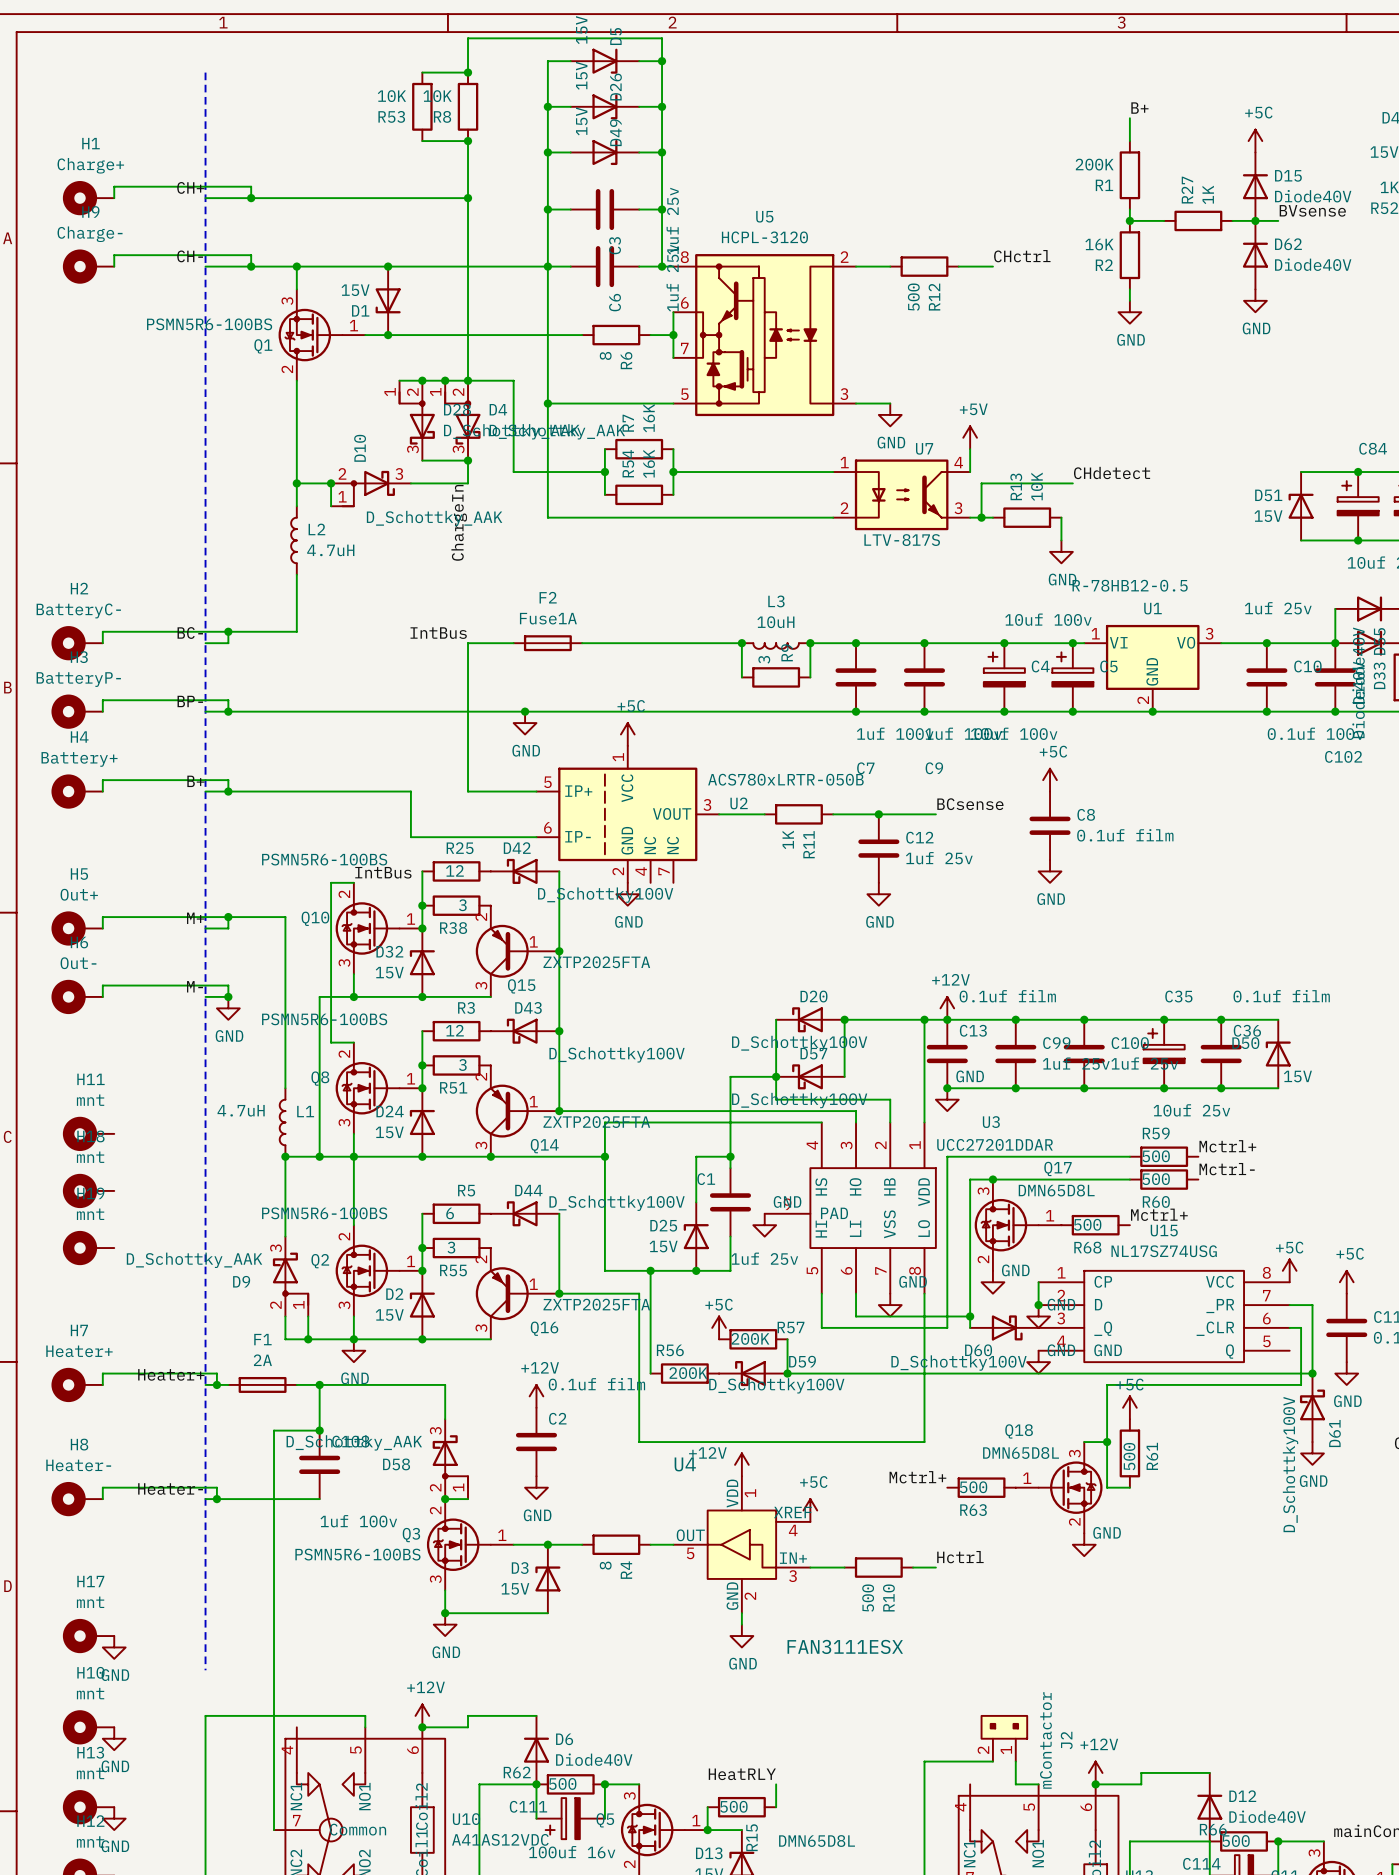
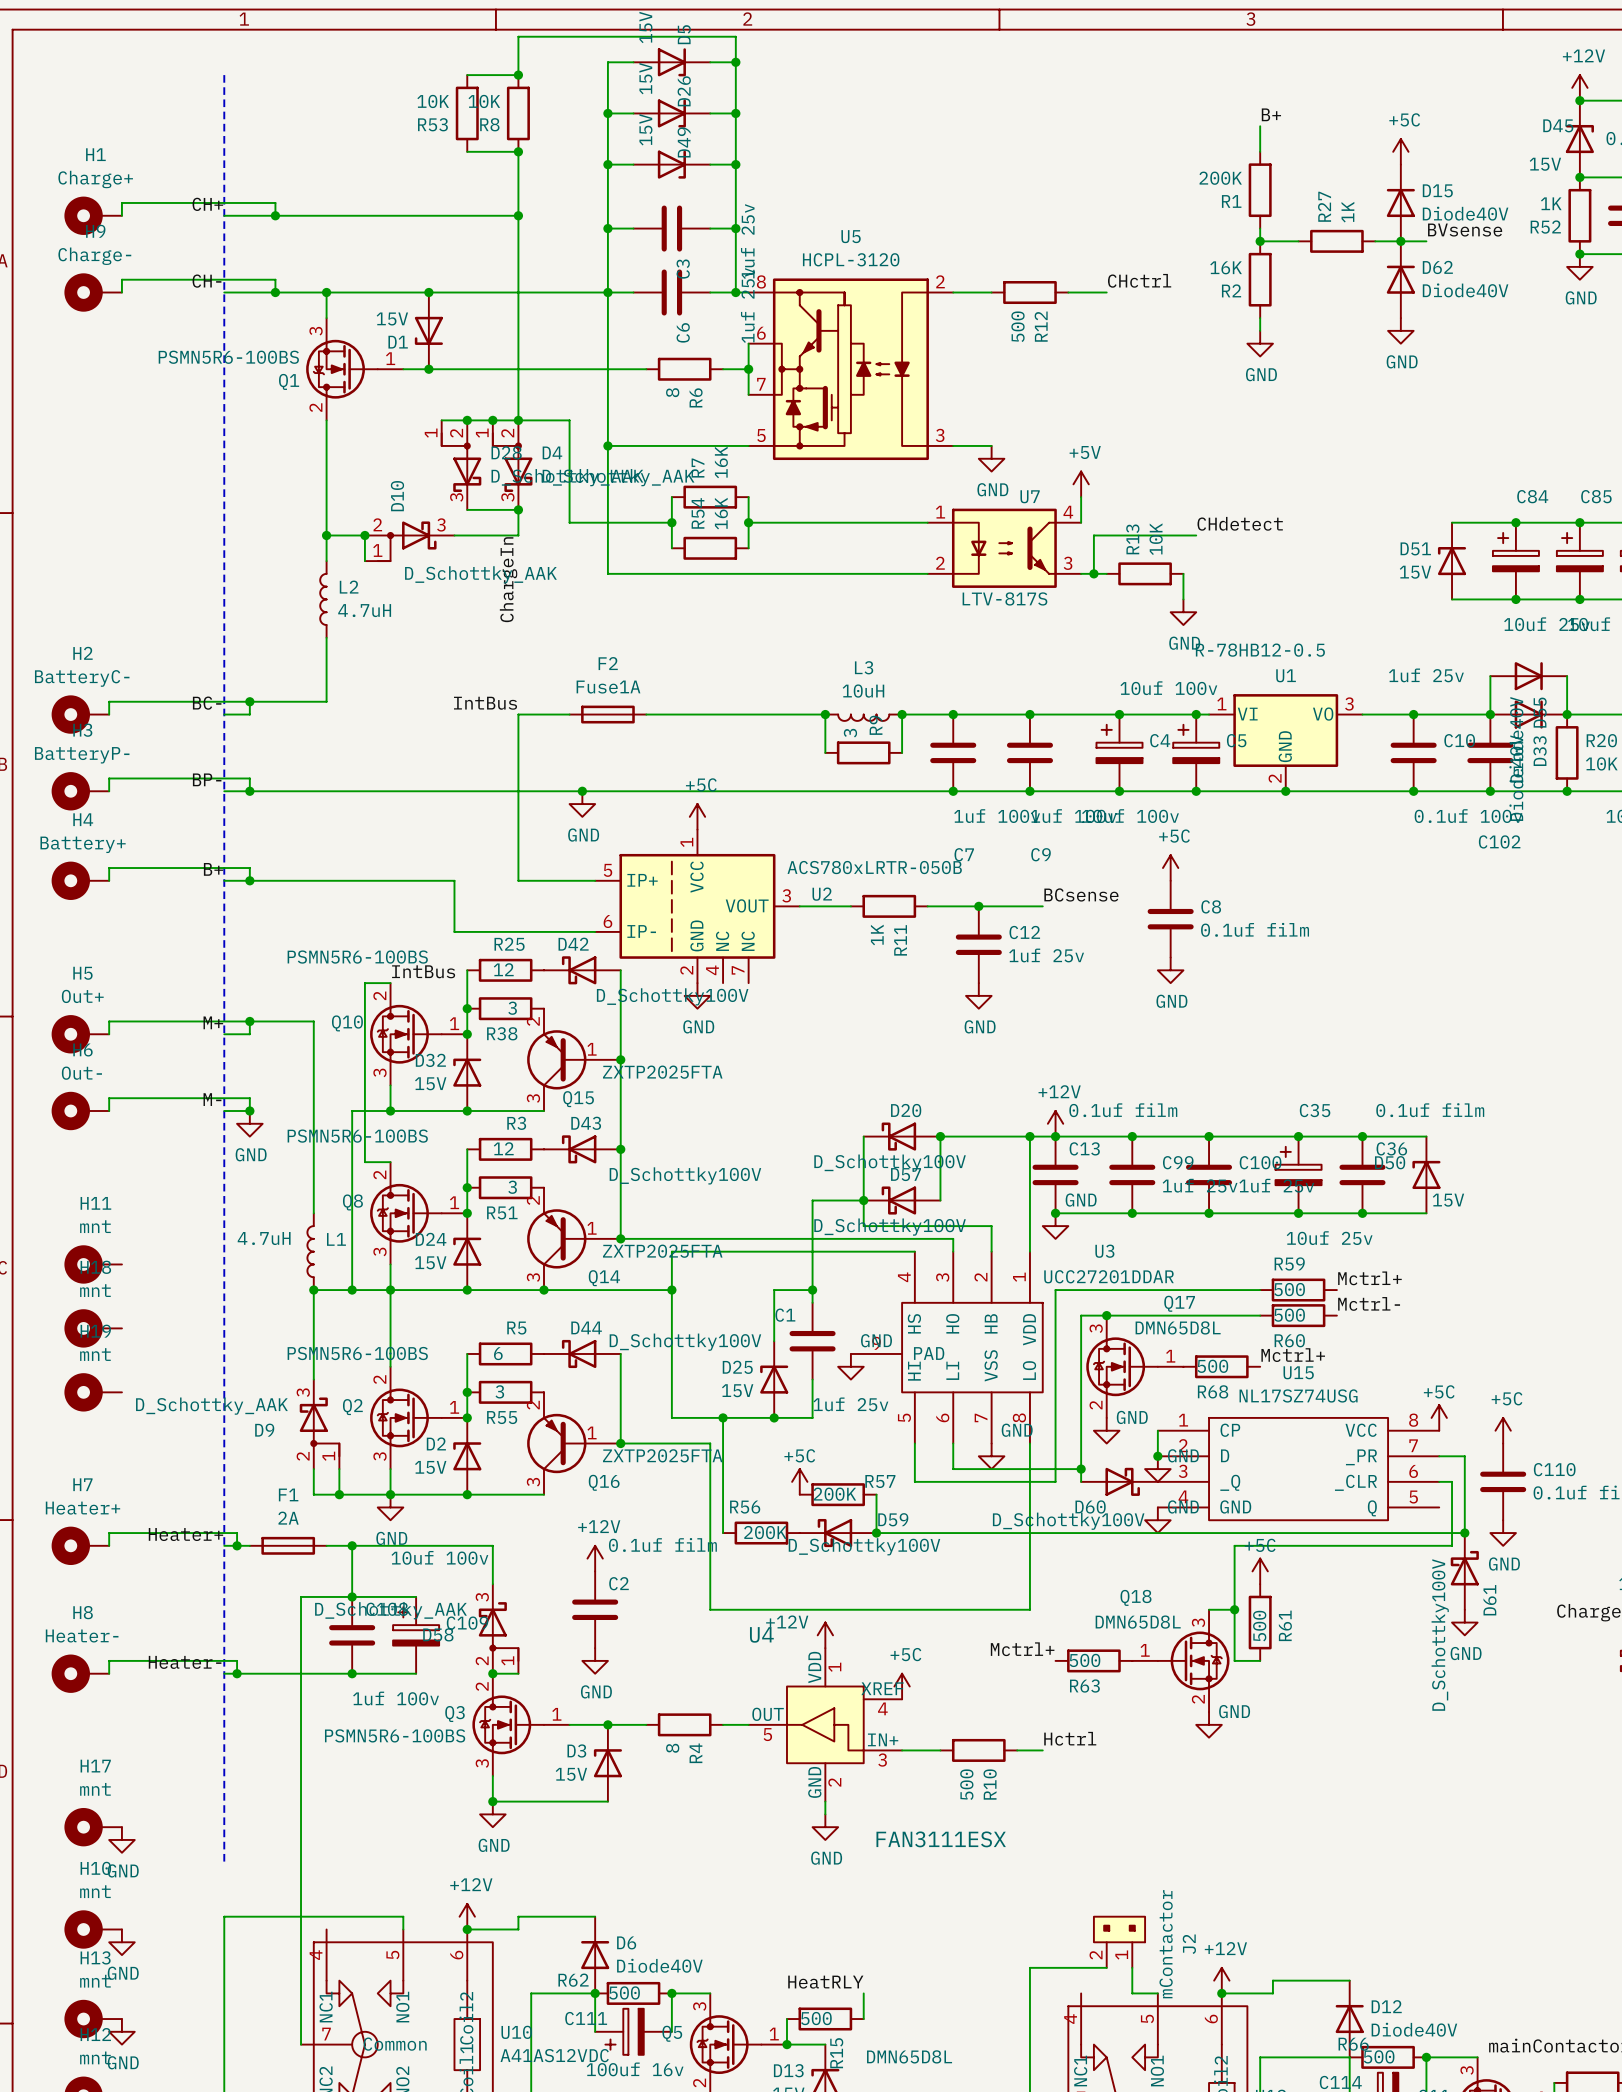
wire: none -> (352, 1596) (416, 1596)
C109: none -> 10uf 100v (416, 1635)
wire: none -> (352, 1673) (416, 1673)
junction: none -> (352, 1673)

